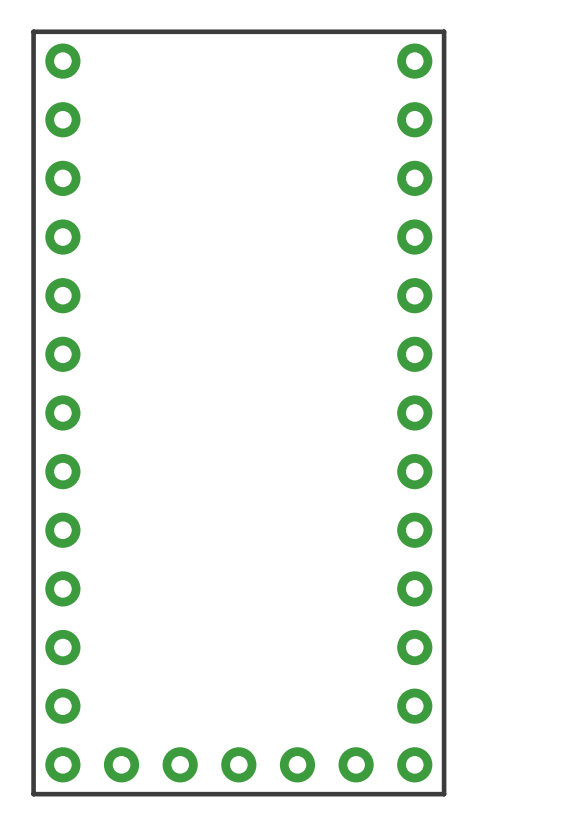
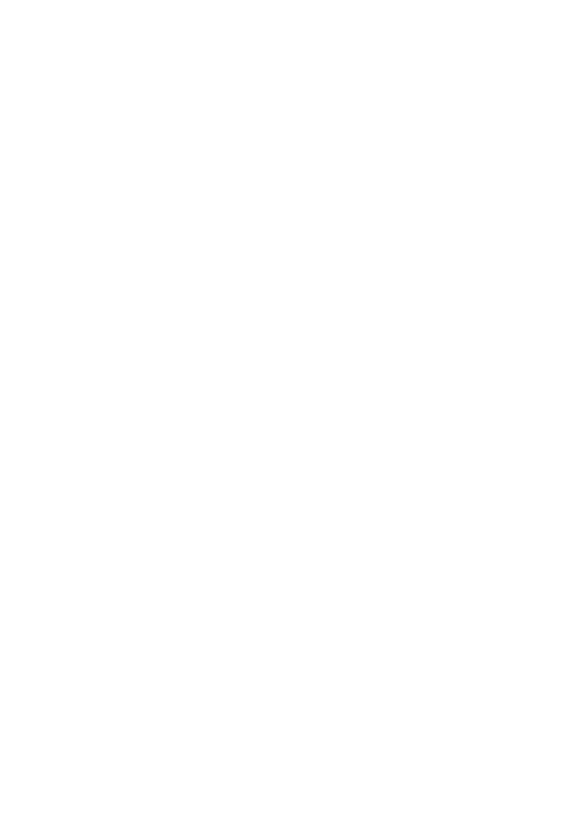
part: (238, 412) -> none

